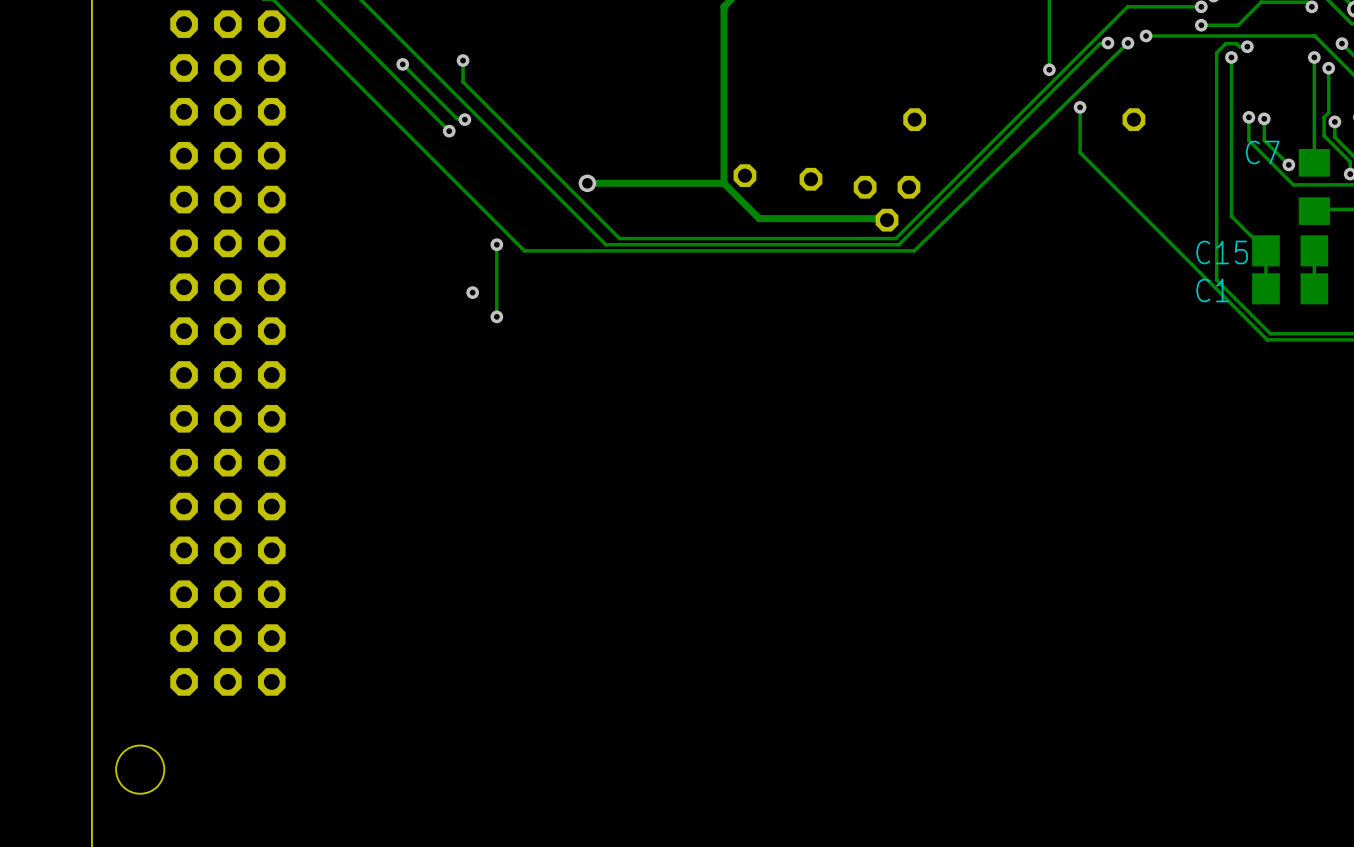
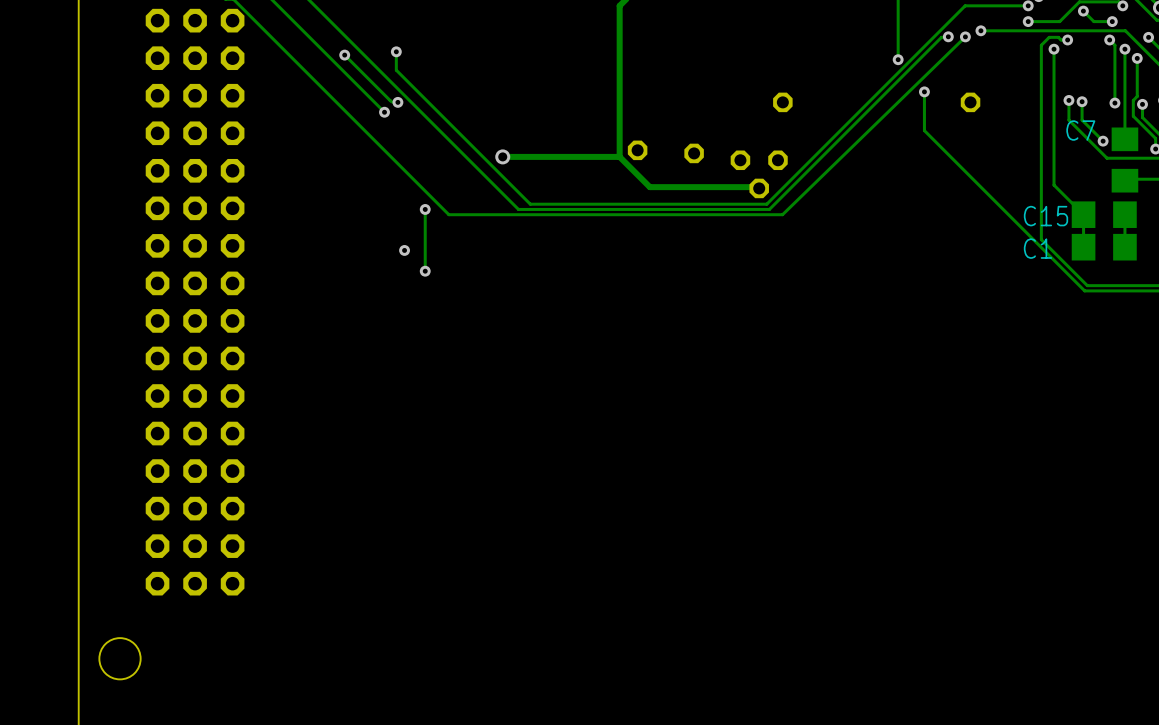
track: none -> (1083, 11) (1093, 21) (1112, 21)
via: none -> (1083, 11)
via: none -> (1112, 21)
track: none -> (1109, 39) (1114, 45) (1114, 103)
via: none -> (1109, 39)
via: none -> (1114, 103)

